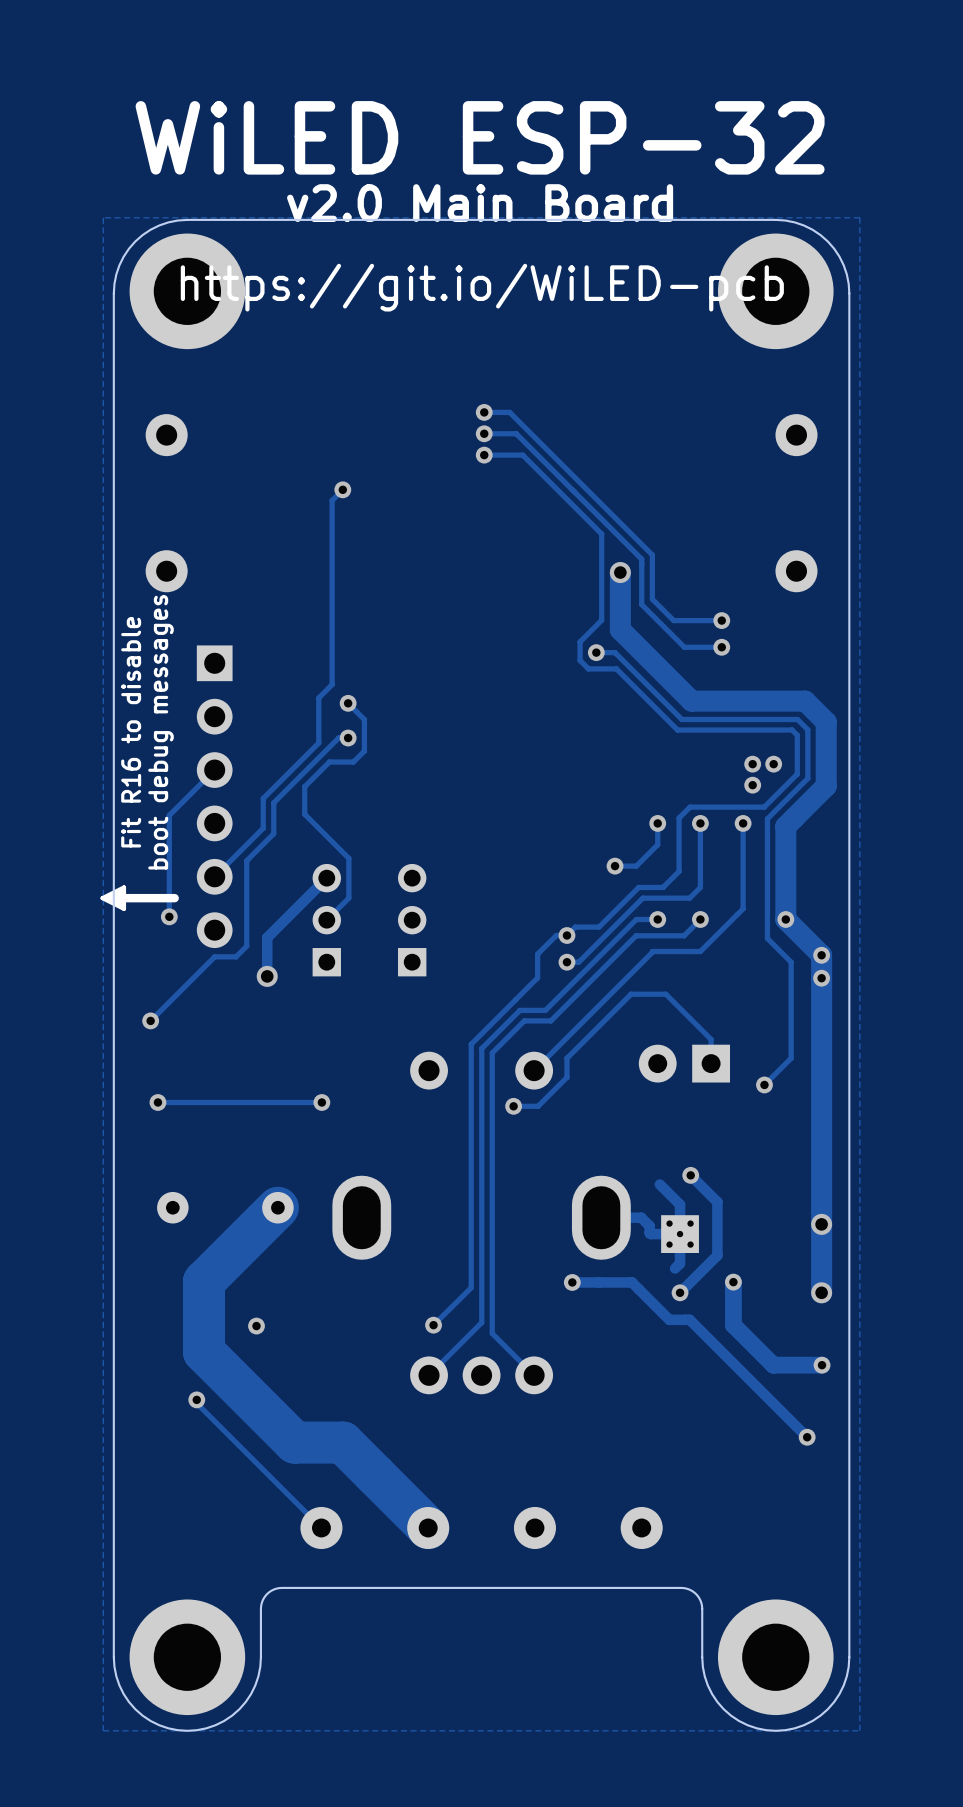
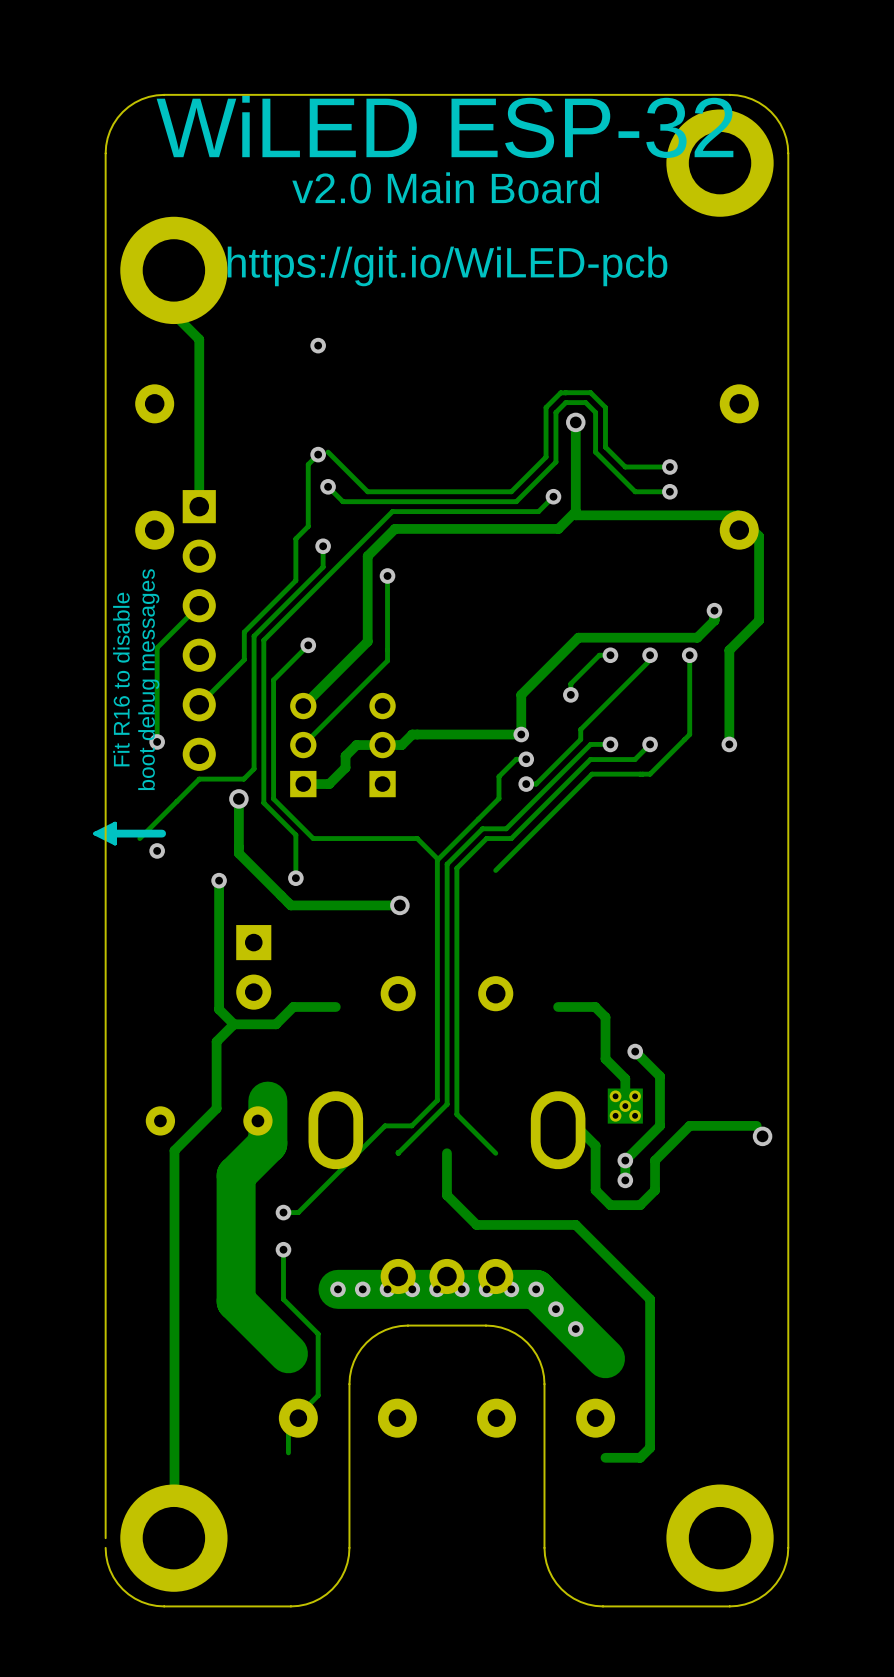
zone outline: (859, 217) (103, 217) (103, 1730) (859, 1730) (859, 217) -> none
part position: (775, 291) -> (720, 163)
board edge: (849, 293) (843, 265) (827, 241) (803, 225) (775, 219) (177, 220) (150, 229) (129, 248) (116, 274) (113, 293) -> (788, 272) (788, 153) (786, 138) (776, 117) (765, 106) (744, 96) (729, 94) (164, 94) (149, 96) (134, 102) (122, 112) (113, 124) (107, 138) (105, 153) (105, 272)
track: none -> (154, 294) (199, 339) (199, 506)
via: none -> (318, 345)
track: (484, 412) (509, 412) (652, 555) (652, 599) (673, 620) (721, 620) -> none
via: (484, 412) -> none
track: (484, 433) (516, 433) (641, 559) (641, 604) (684, 647) (721, 647) -> none
via: (484, 433) -> none
track: (484, 455) (522, 455) (601, 534) (601, 620) (580, 641) (580, 660) (588, 668) (616, 668) (677, 730) (792, 730) (797, 735) (797, 774) (764, 807) (690, 807) (679, 818) (679, 871) (663, 887) (638, 887) (599, 927) (575, 927) (566, 935) (556, 935) (537, 954) (537, 977) (471, 1044) -> (308, 645) (273, 680) (273, 798) (313, 838) (417, 838) (437, 858) (437, 969)
via: (484, 455) -> none
track: none -> (575, 422) (575, 515) (738, 515) (759, 536) (759, 620) (729, 650) (729, 744)
track: none -> (328, 452) (367, 491) (511, 491) (546, 457) (546, 407) (560, 392) (590, 392) (605, 407) (605, 447) (625, 467) (669, 467)
via: none -> (669, 467)
track: none -> (328, 486) (342, 501) (516, 501) (555, 462) (555, 412) (565, 402) (585, 402) (595, 412) (595, 452) (635, 491) (669, 491)
via: none -> (328, 486)
via: none -> (669, 491)
track: none -> (553, 496) (538, 511) (392, 511) (263, 640) (263, 802) (295, 835) (295, 878)
via: none -> (553, 496)
track: none -> (575, 511) (558, 528) (394, 528) (367, 556) (367, 641) (303, 706)
track: (332, 567) (332, 684) (318, 697) (318, 742) (263, 798) (263, 828) (214, 876) -> (308, 526) (295, 538) (295, 580) (244, 632) (244, 659) (199, 704)
track: (620, 572) (620, 629) (691, 701) (805, 701) (826, 722) (826, 786) (785, 826) (785, 919) (821, 955) (821, 1292) -> none
via position: (620, 572) -> (575, 422)
via: none -> (323, 546)
track: none -> (387, 575) (387, 660) (303, 745)
via: none -> (387, 575)
via: (721, 620) -> none
via: (721, 647) -> none
track: (596, 652) (615, 652) (681, 719) (797, 719) (807, 729) (807, 778) (767, 818) (767, 938) (791, 962) (791, 1058) (764, 1084) -> none
via: (596, 652) -> none
track: none -> (714, 610) (714, 620) (697, 637) (578, 637) (521, 694) (521, 734) (412, 734) (401, 745) (356, 745) (345, 756) (345, 767) (329, 784) (303, 784)
via: none -> (714, 610)
track: (348, 703) (364, 719) (364, 751) (353, 762) (329, 762) (304, 786) (304, 814) (348, 858) (348, 898) (326, 920) -> none
via position: (348, 703) -> (308, 645)
track: none -> (610, 655) (599, 655) (570, 683) (570, 694)
via: none -> (610, 655)
track: none -> (650, 655) (650, 660) (580, 729) (580, 739) (536, 784) (526, 784)
via: none -> (650, 655)
track: none -> (689, 655) (689, 734) (650, 774) (592, 774) (495, 870)
via: none -> (689, 655)
track: (348, 738) (338, 738) (273, 802) -> (323, 546) (323, 567) (254, 636) (254, 745)
via: (348, 738) -> none
via: none -> (570, 694)
via: (752, 764) -> none
via: (773, 764) -> none
track: (214, 770) (169, 815) (169, 916) -> (199, 605) (157, 647) (157, 741)
via: (752, 785) -> none
via: none -> (521, 734)
part position: (214, 796) -> (199, 630)
via: none -> (157, 741)
part: none -> (303, 745)
part: none -> (382, 745)
via: none -> (729, 744)
track: none -> (526, 759) (516, 759) (498, 776) (498, 798) (437, 860)
via: none -> (526, 759)
track: (657, 823) (657, 844) (636, 866) (615, 866) -> none
via position: (657, 823) -> (610, 744)
track: (700, 823) (700, 887) (689, 898) (642, 898) (578, 962) (566, 962) -> none
via position: (700, 823) -> (650, 744)
track: (743, 823) (743, 908) (700, 951) (652, 951) (534, 1070) -> none
via: (743, 823) -> none
track: (273, 828) (273, 833) (246, 860) (246, 946) (236, 956) (214, 956) (150, 1020) -> (254, 768) (243, 779) (199, 779) (139, 838)
via: none -> (526, 784)
track: none -> (238, 798) (238, 853) (290, 905) (399, 905)
via: none -> (238, 798)
via: (615, 866) -> none
track: (326, 878) (267, 937) (267, 976) -> none
track: (657, 919) (636, 919) (545, 1010) (519, 1010) (481, 1048) -> (610, 744) (590, 744) (506, 828) (482, 828) (447, 864) (447, 973)
via: (657, 919) -> none
track: (700, 919) (684, 935) (636, 935) (550, 1020) (524, 1020) (492, 1052) -> (650, 744) (634, 759) (590, 759) (511, 838) (486, 838) (456, 868) (456, 977)
via: (700, 919) -> none
via: (785, 919) -> none
part: (326, 920) -> none
part: (412, 920) -> none
via: (566, 935) -> none
via: none -> (295, 878)
track: none -> (219, 880) (219, 1009) (233, 1024)
via: none -> (219, 880)
via: (821, 955) -> none
via: (566, 962) -> none
via: none -> (399, 905)
via: (267, 976) -> none
via: (821, 978) -> none
via: (150, 1020) -> none
part rotation: 0° (684, 1063) -> 90° counterclockwise (253, 967)
part position: (684, 1063) -> (253, 967)
track: (711, 1063) (711, 1039) (665, 994) (631, 994) (566, 1058) (566, 1077) (538, 1106) (513, 1106) -> none
track: none -> (335, 1006) (293, 1006) (276, 1024) (233, 1024)
track: none -> (558, 1006) (595, 1006) (605, 1017) (605, 1058) (625, 1078) (625, 1106)
via: (764, 1084) -> none
via: (157, 1102) -> none
track: (321, 1102) (157, 1102) -> none
via: (321, 1102) -> none
track: none -> (233, 1024) (216, 1041) (216, 1108) (174, 1150) (174, 1537)
via: (513, 1106) -> none
track: none -> (635, 1051) (659, 1076) (659, 1125) (625, 1160) (625, 1180)
via: none -> (635, 1051)
track: (690, 1175) (717, 1202) (717, 1255) (680, 1292) -> none
via: (690, 1175) -> none
track: (659, 1184) (680, 1204) (680, 1263) (675, 1268) -> none
track: (471, 1185) (471, 1287) (432, 1326) -> (437, 1100) (411, 1125) (385, 1125) (298, 1212) (283, 1212)
track: (481, 1189) (481, 1322) (429, 1374) -> (447, 1104) (398, 1152)
track: (492, 1200) (492, 1333) (534, 1375) -> (456, 1114) (495, 1153)
track: (277, 1207) (204, 1281) (204, 1351) (254, 1402) -> (267, 1101) (267, 1143) (236, 1175) (236, 1301)
track: none -> (570, 1120) (595, 1145) (595, 1190) (610, 1205) (640, 1205) (655, 1190) (655, 1160) (689, 1125) (756, 1125)
track: (601, 1217) (641, 1217) (649, 1226) (650, 1234) (680, 1234) -> none
part position: (680, 1234) -> (625, 1106)
track: none -> (446, 1153) (446, 1195) (476, 1224) (575, 1224) (650, 1299) (650, 1447) (640, 1457) (605, 1457)
via: none -> (625, 1160)
via: none -> (625, 1180)
track: (572, 1282) (632, 1282) (669, 1319) (689, 1319) (807, 1437) -> none
via: (572, 1282) -> none
track: (733, 1282) (733, 1325) (773, 1365) (822, 1365) -> none
via: (733, 1282) -> none
via: (680, 1292) -> none
via: (821, 1292) -> none
via: none -> (283, 1212)
via: (433, 1325) -> none
via: (256, 1326) -> none
track: none -> (283, 1249) (283, 1299) (318, 1333) (318, 1395) (288, 1425) (288, 1452)
via: none -> (283, 1249)
via: (822, 1365) -> none
track: none -> (337, 1289) (536, 1289) (605, 1358)
via: none -> (337, 1289)
via: none -> (362, 1289)
via: none -> (387, 1289)
via: none -> (412, 1289)
via: none -> (437, 1289)
via: none -> (461, 1289)
via: none -> (486, 1289)
via: none -> (511, 1289)
via: none -> (536, 1289)
track: (196, 1399) (196, 1403) (321, 1527) -> none
via: (196, 1399) -> none
via: none -> (555, 1309)
via: none -> (575, 1329)
via: (807, 1437) -> none
track: (294, 1442) (342, 1442) (428, 1527) -> (273, 1338) (288, 1353)
board edge: (849, 1657) (843, 1685) (827, 1709) (803, 1725) (775, 1730) (756, 1728) (739, 1720) (723, 1709) (712, 1694) (702, 1666) (701, 1603) (696, 1594) (683, 1588) (276, 1588) (267, 1594) (261, 1603) (260, 1666) (251, 1694) (232, 1715) (215, 1725) (196, 1730) (168, 1728) (142, 1715) (123, 1694) (116, 1676) (113, 1657) -> (788, 1538) (788, 1547)
board edge: none -> (788, 1547) (783, 1570) (776, 1583) (765, 1594) (744, 1604) (729, 1606) (603, 1606) (580, 1601) (567, 1594) (552, 1577) (544, 1555) (544, 1384) (542, 1368) (532, 1348) (521, 1337) (501, 1327) (485, 1325) (407, 1325) (392, 1327) (372, 1337) (357, 1354) (351, 1368) (349, 1384) (348, 1555) (344, 1570) (337, 1583) (320, 1598) (306, 1604) (290, 1606) (164, 1606) (149, 1604) (128, 1594) (117, 1583) (110, 1570) (105, 1547)

